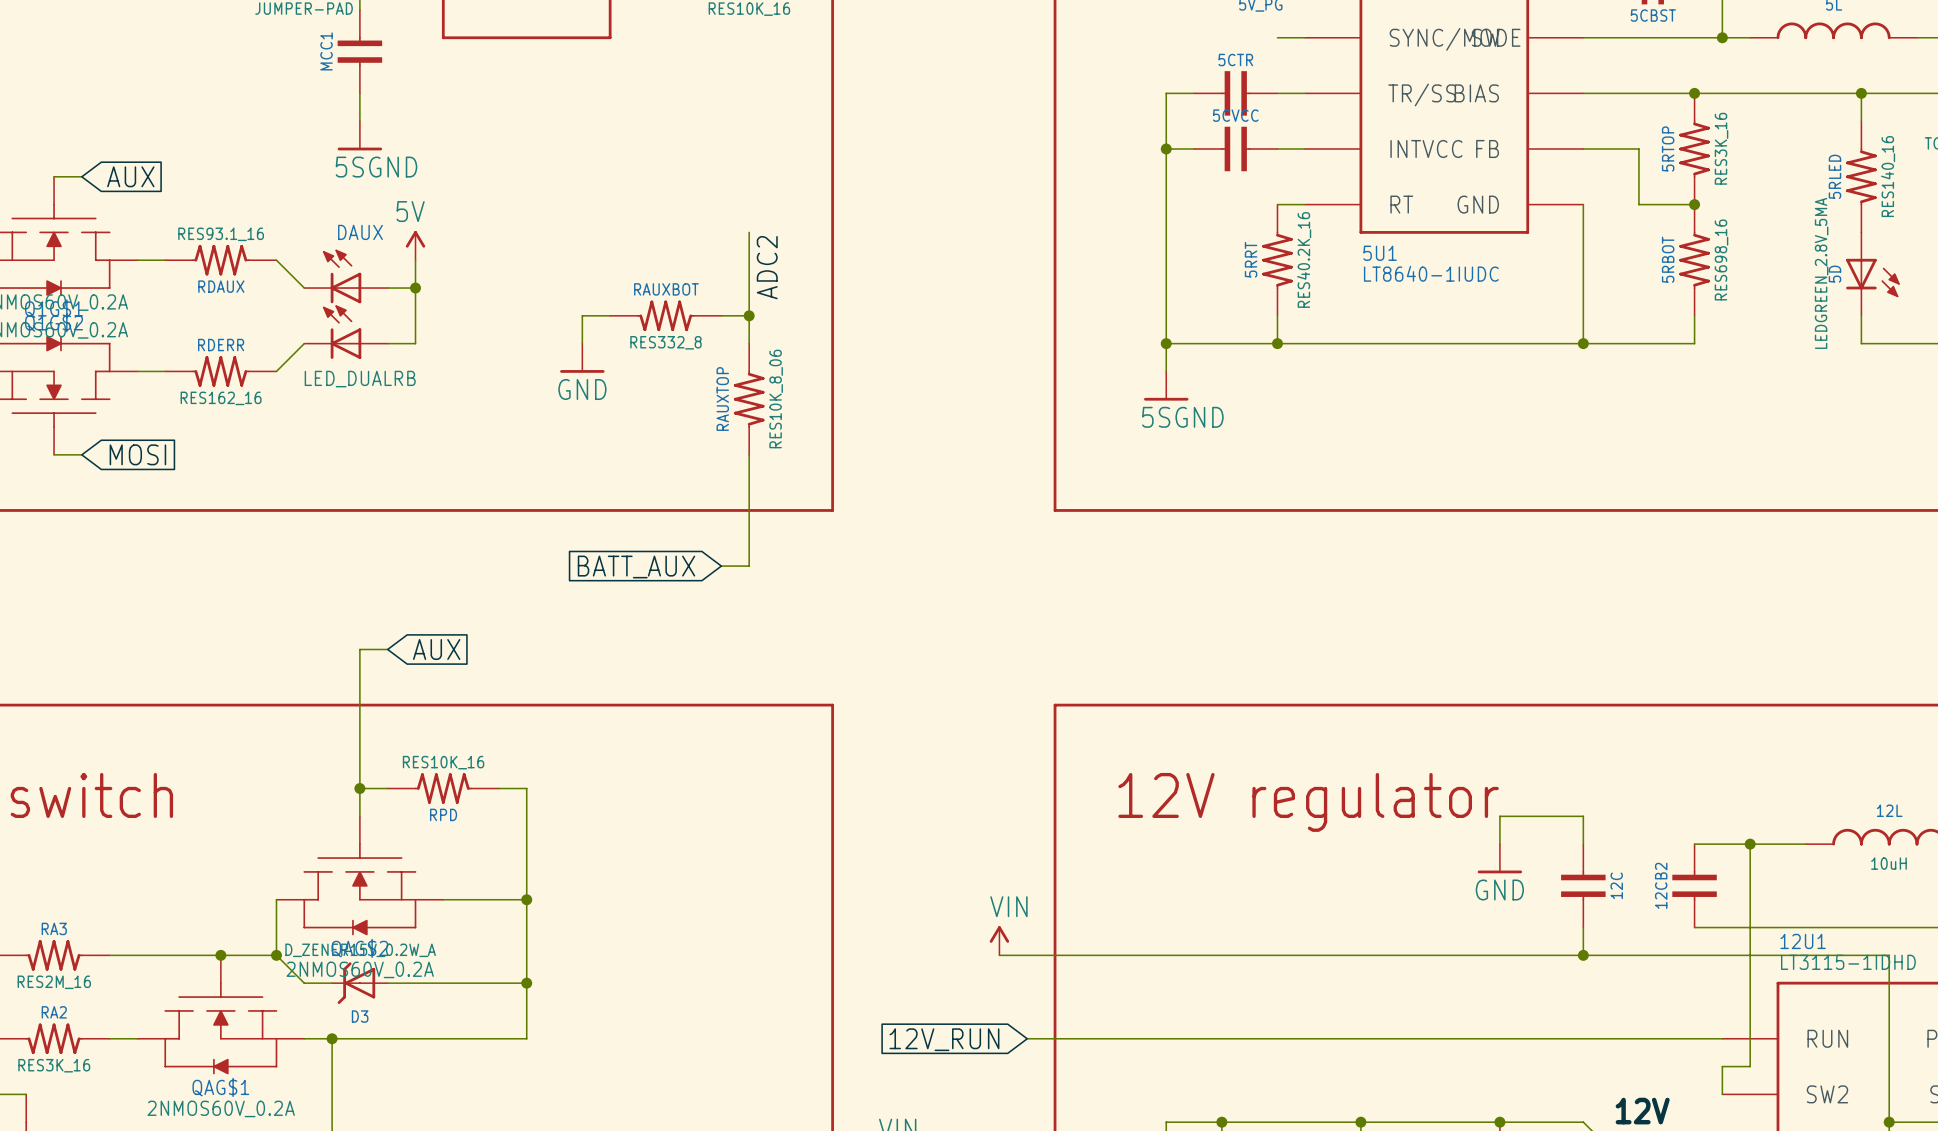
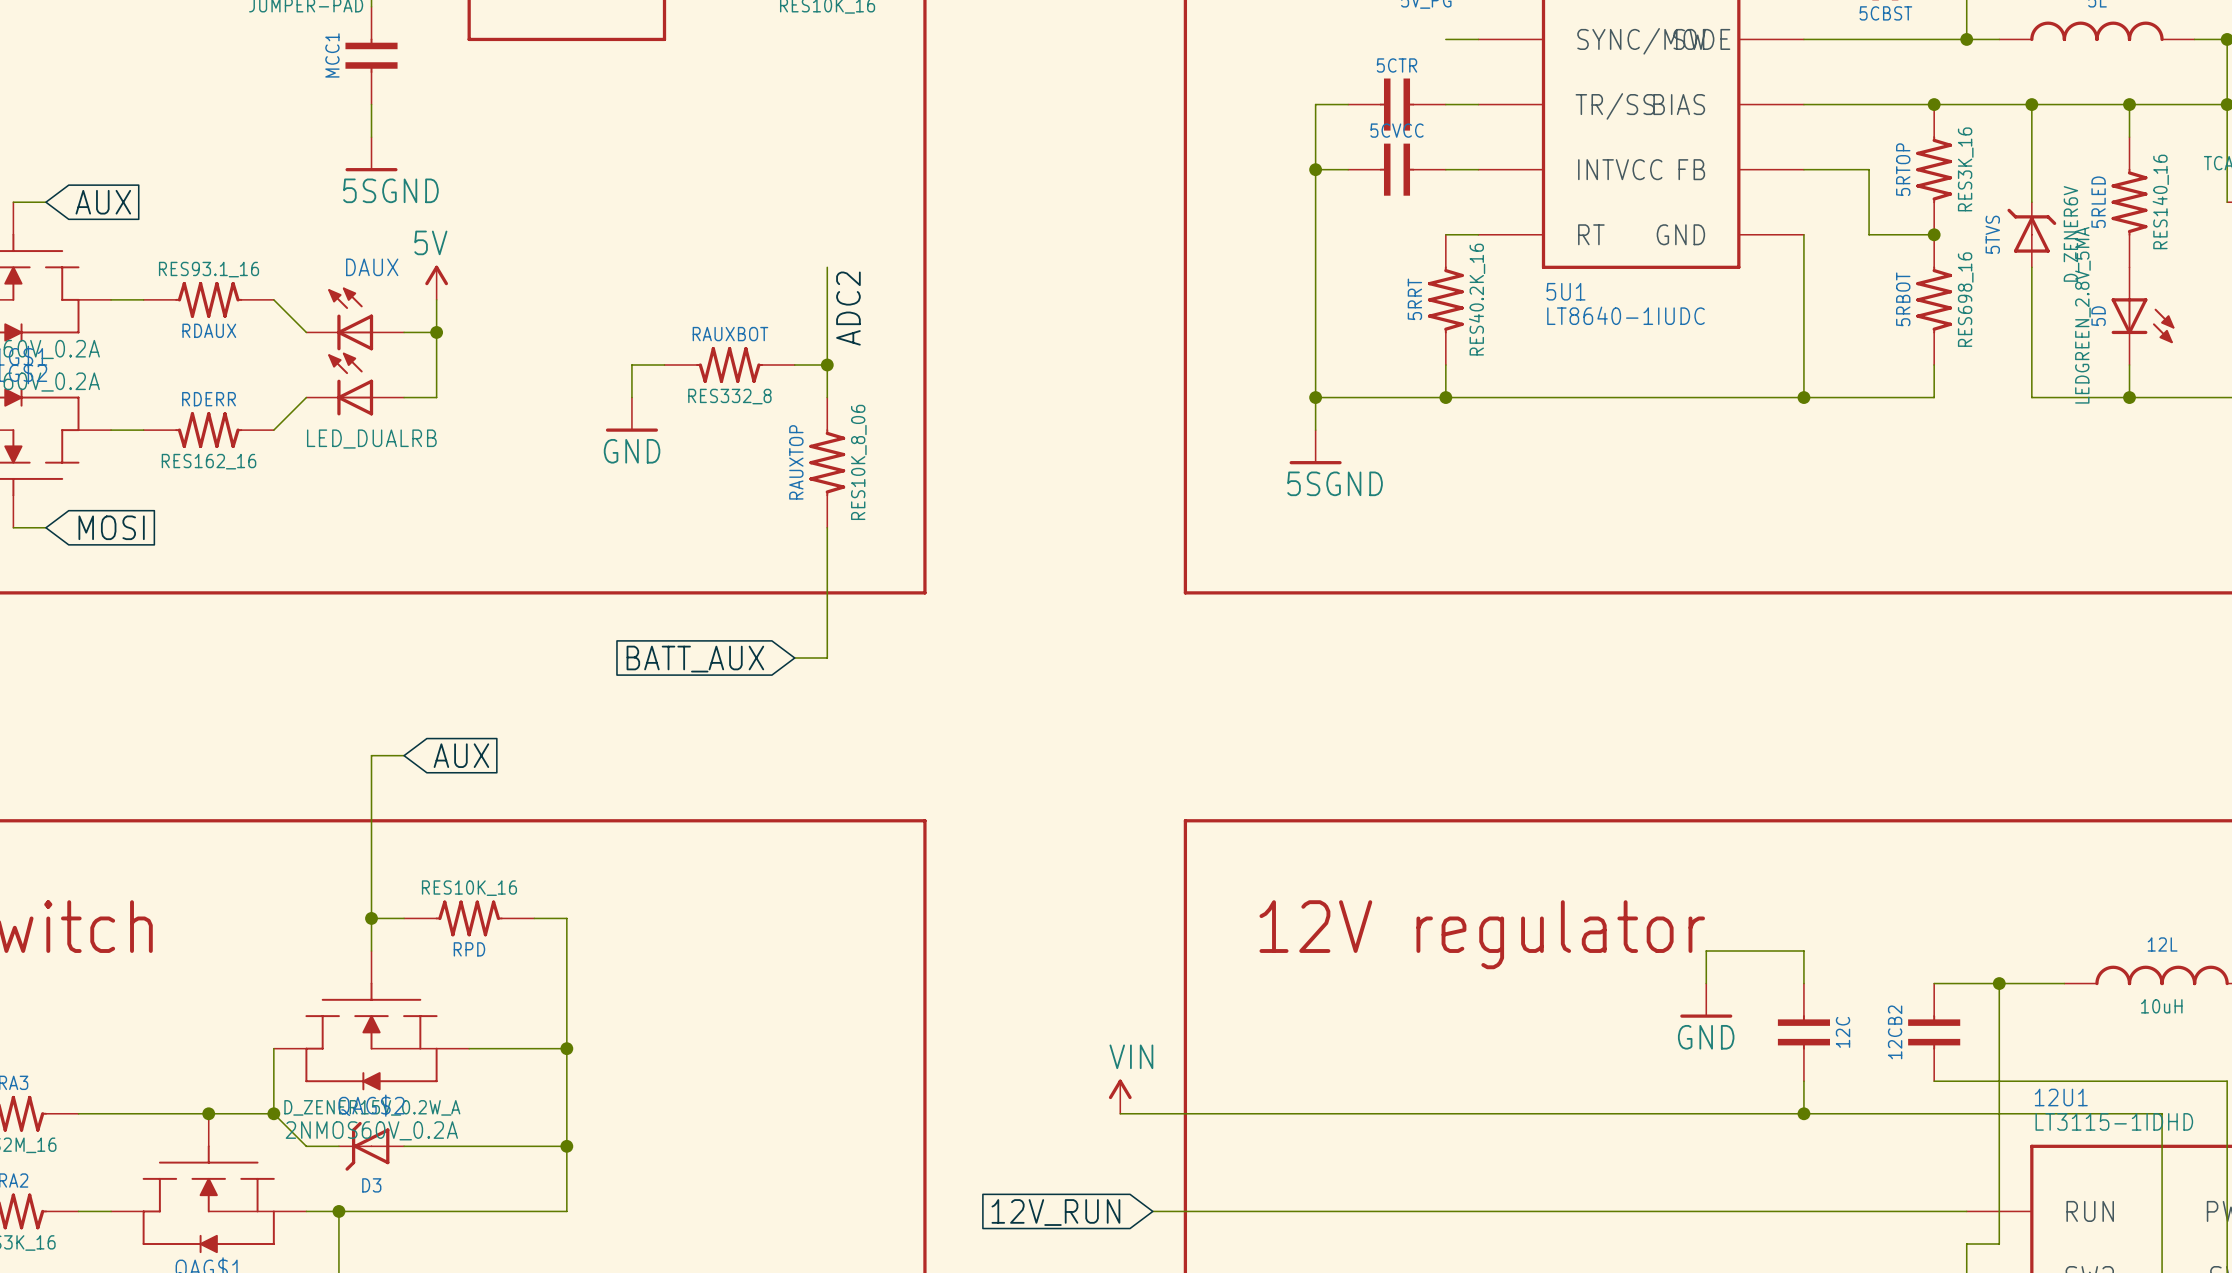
wire: none -> (2031, 104) (2031, 202)
junction: none -> (2031, 104)
5TVS: none -> D_ZENER6V (2031, 234)
wire: none -> (2031, 267) (2031, 397) (2129, 397)
junction: none -> (2129, 397)

